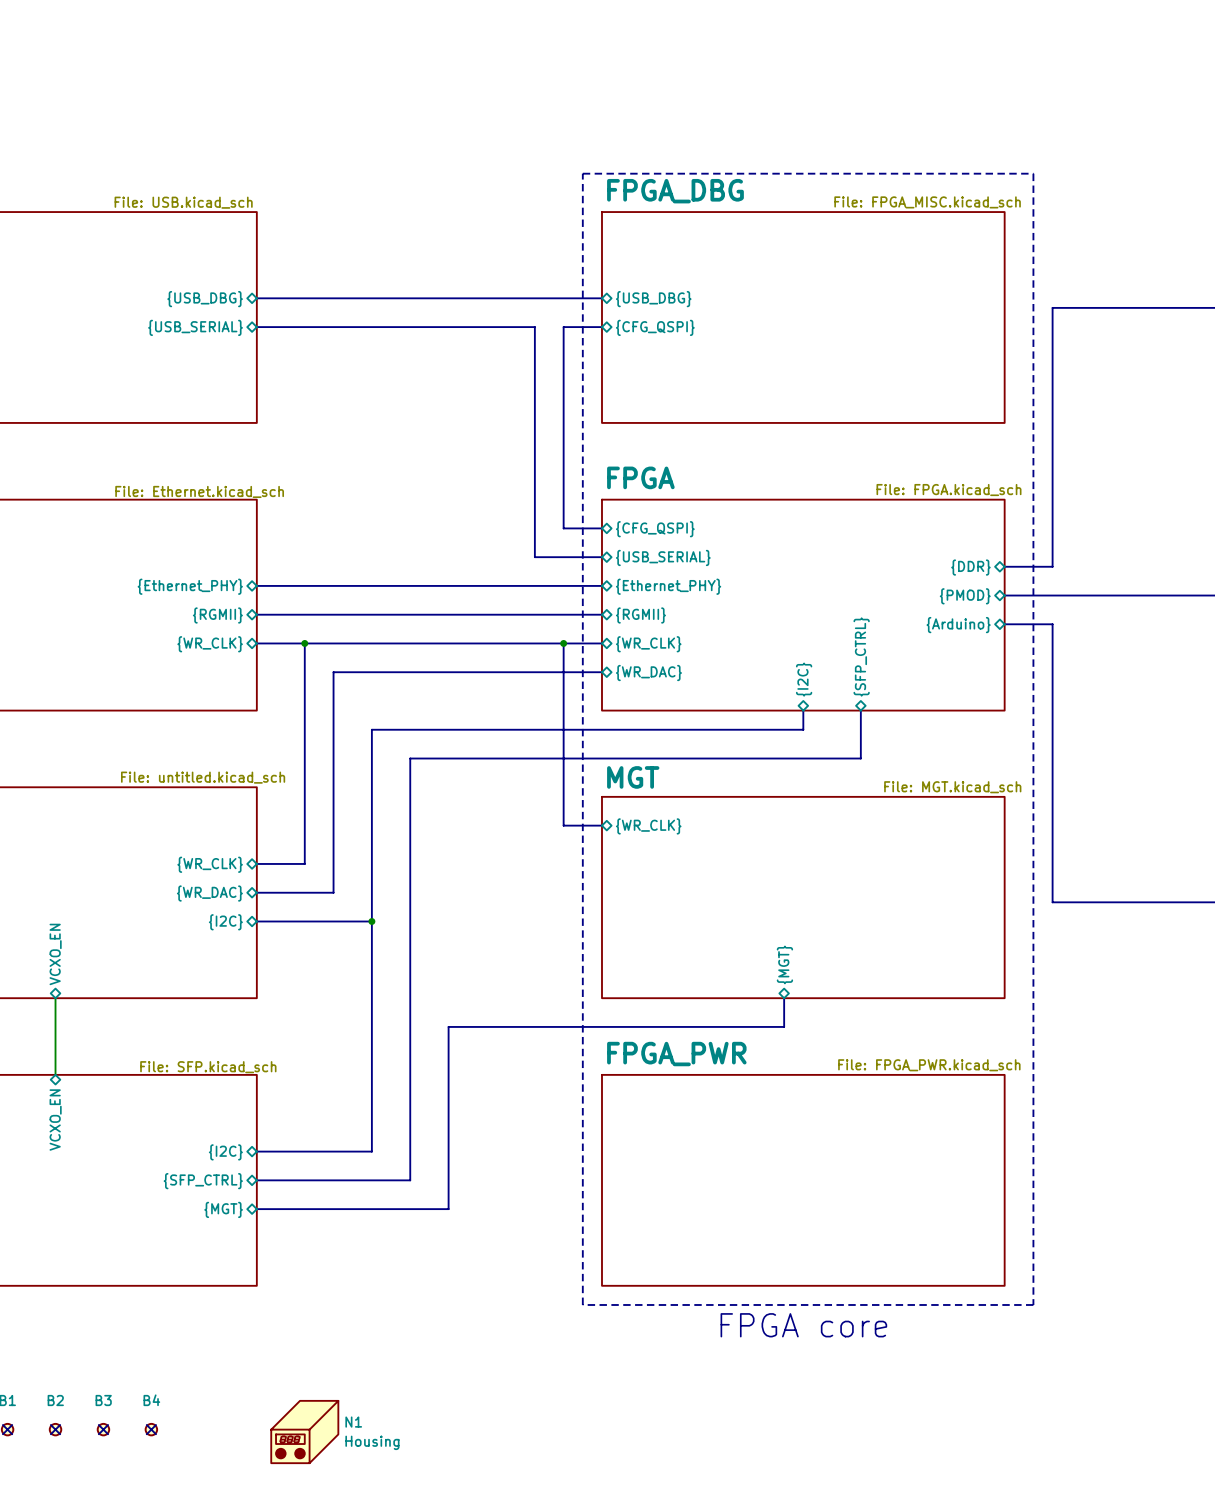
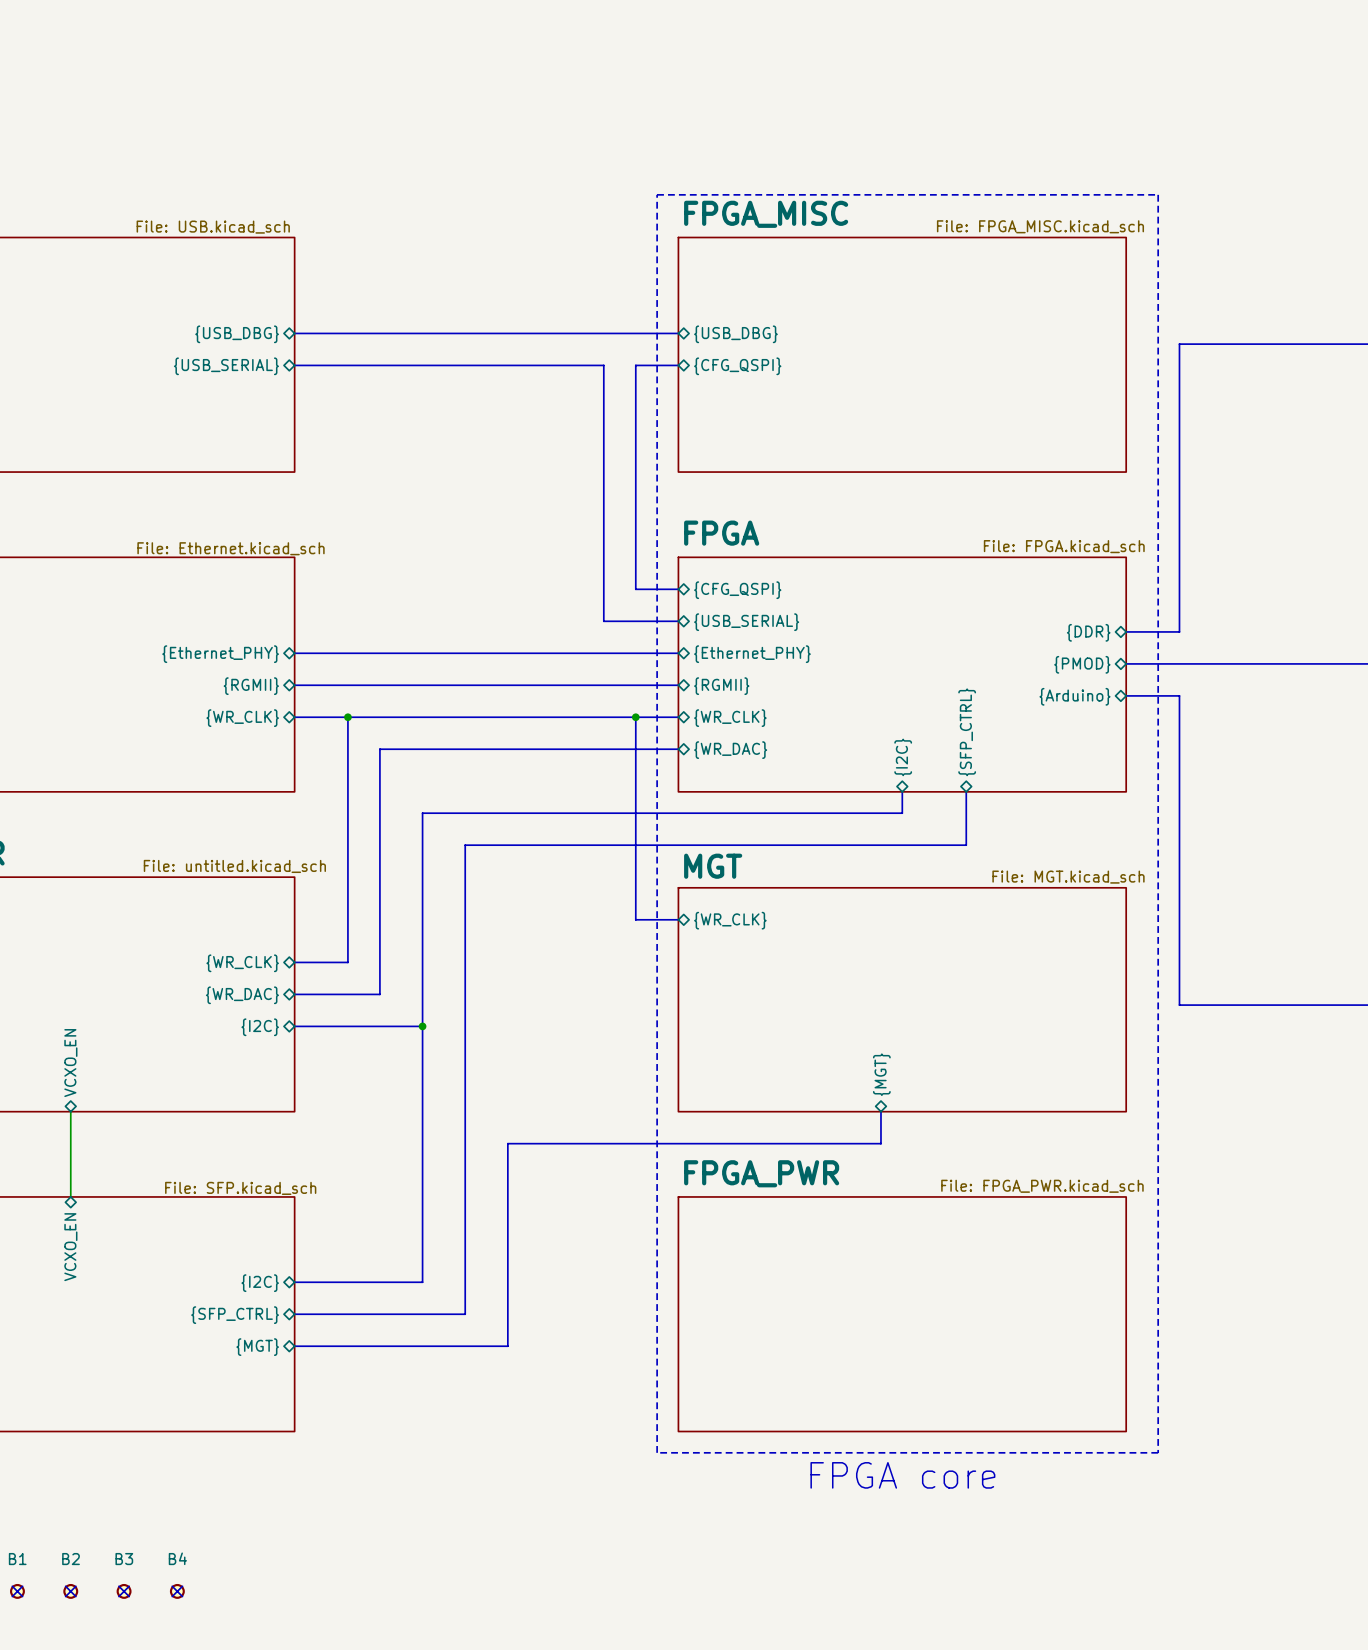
sheet FPGA_DBG name: FPGA_DBG (675, 191) -> FPGA_MISC (766, 214)
N1: Housing (304, 1432) -> none

